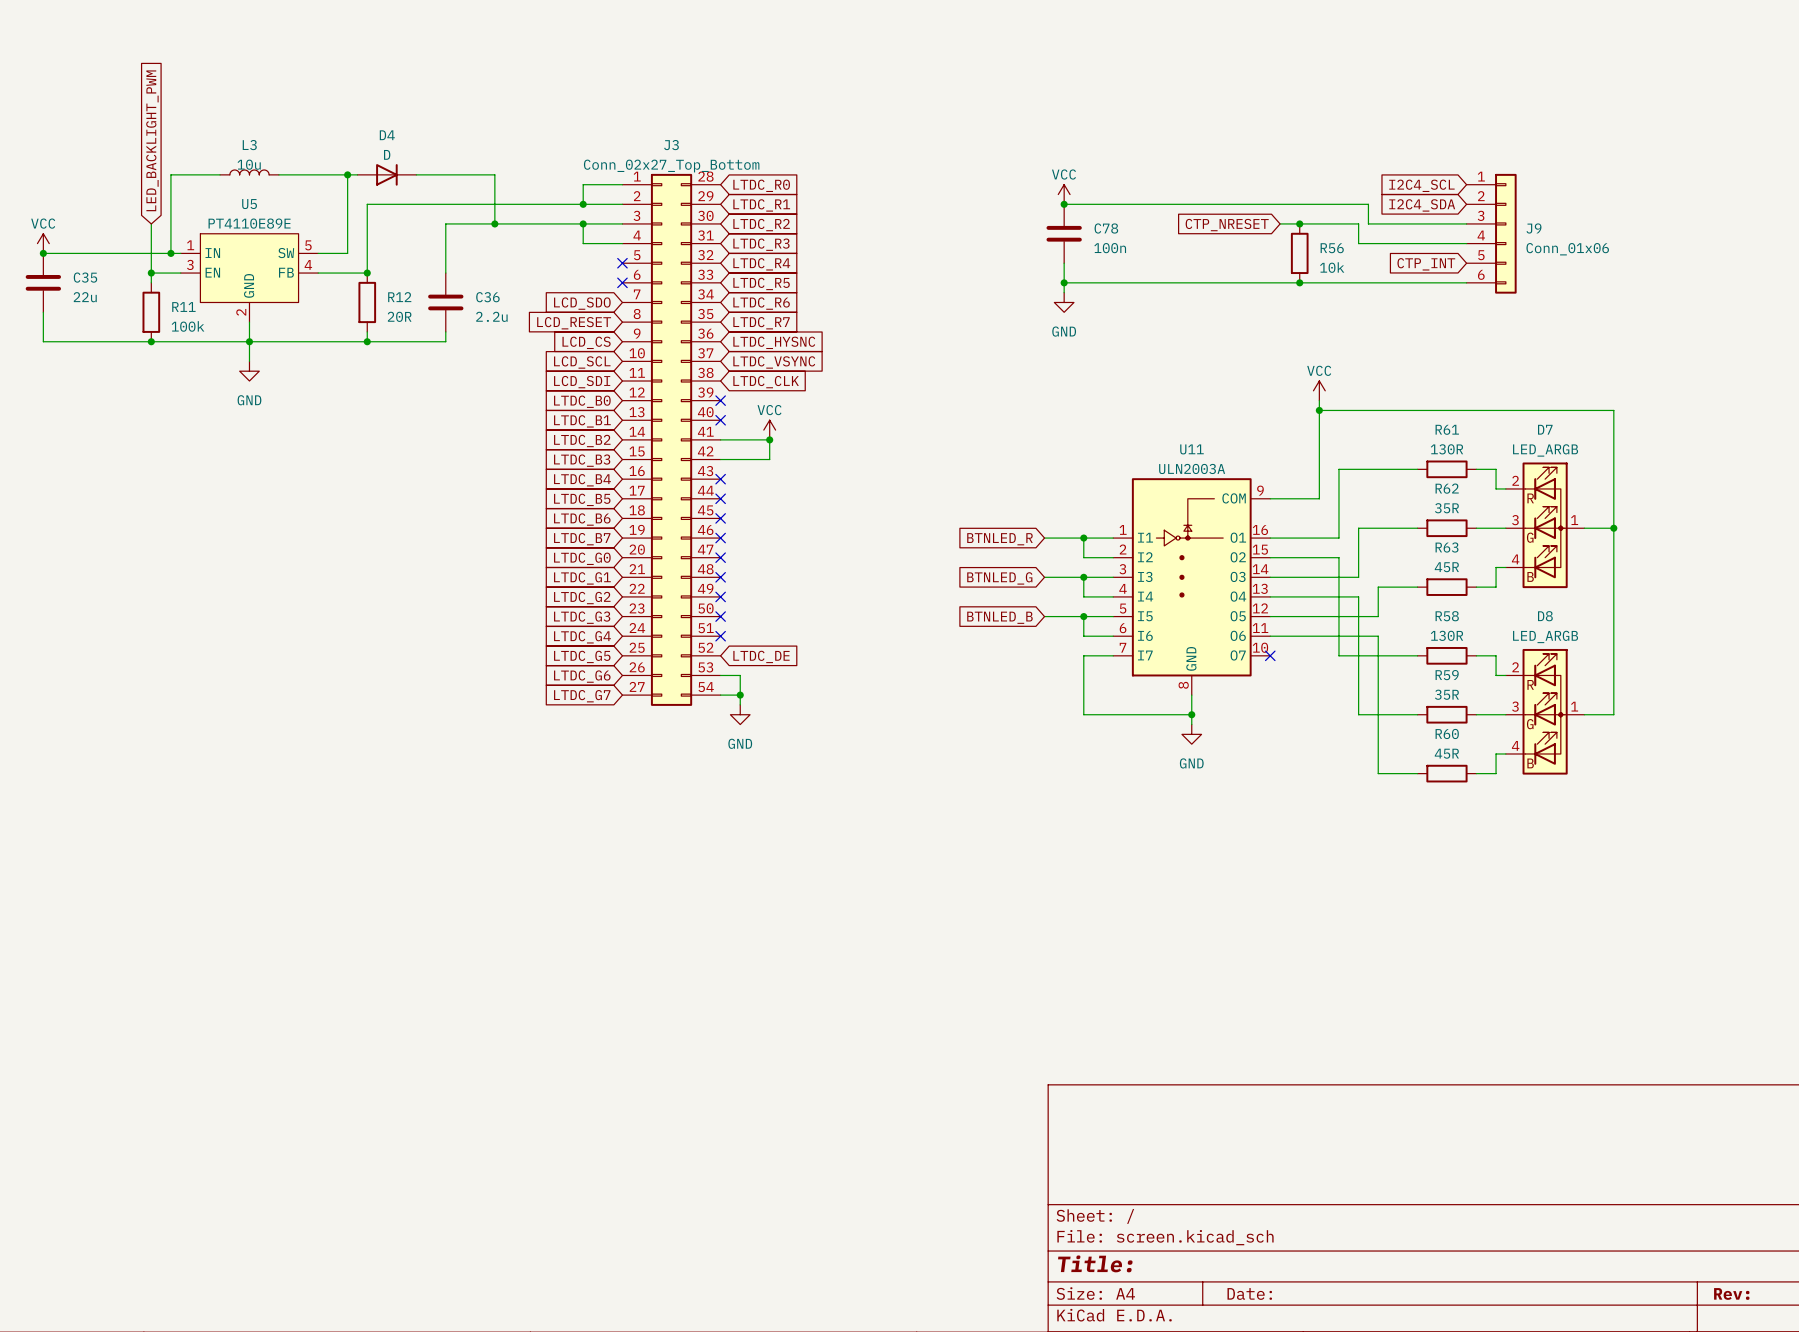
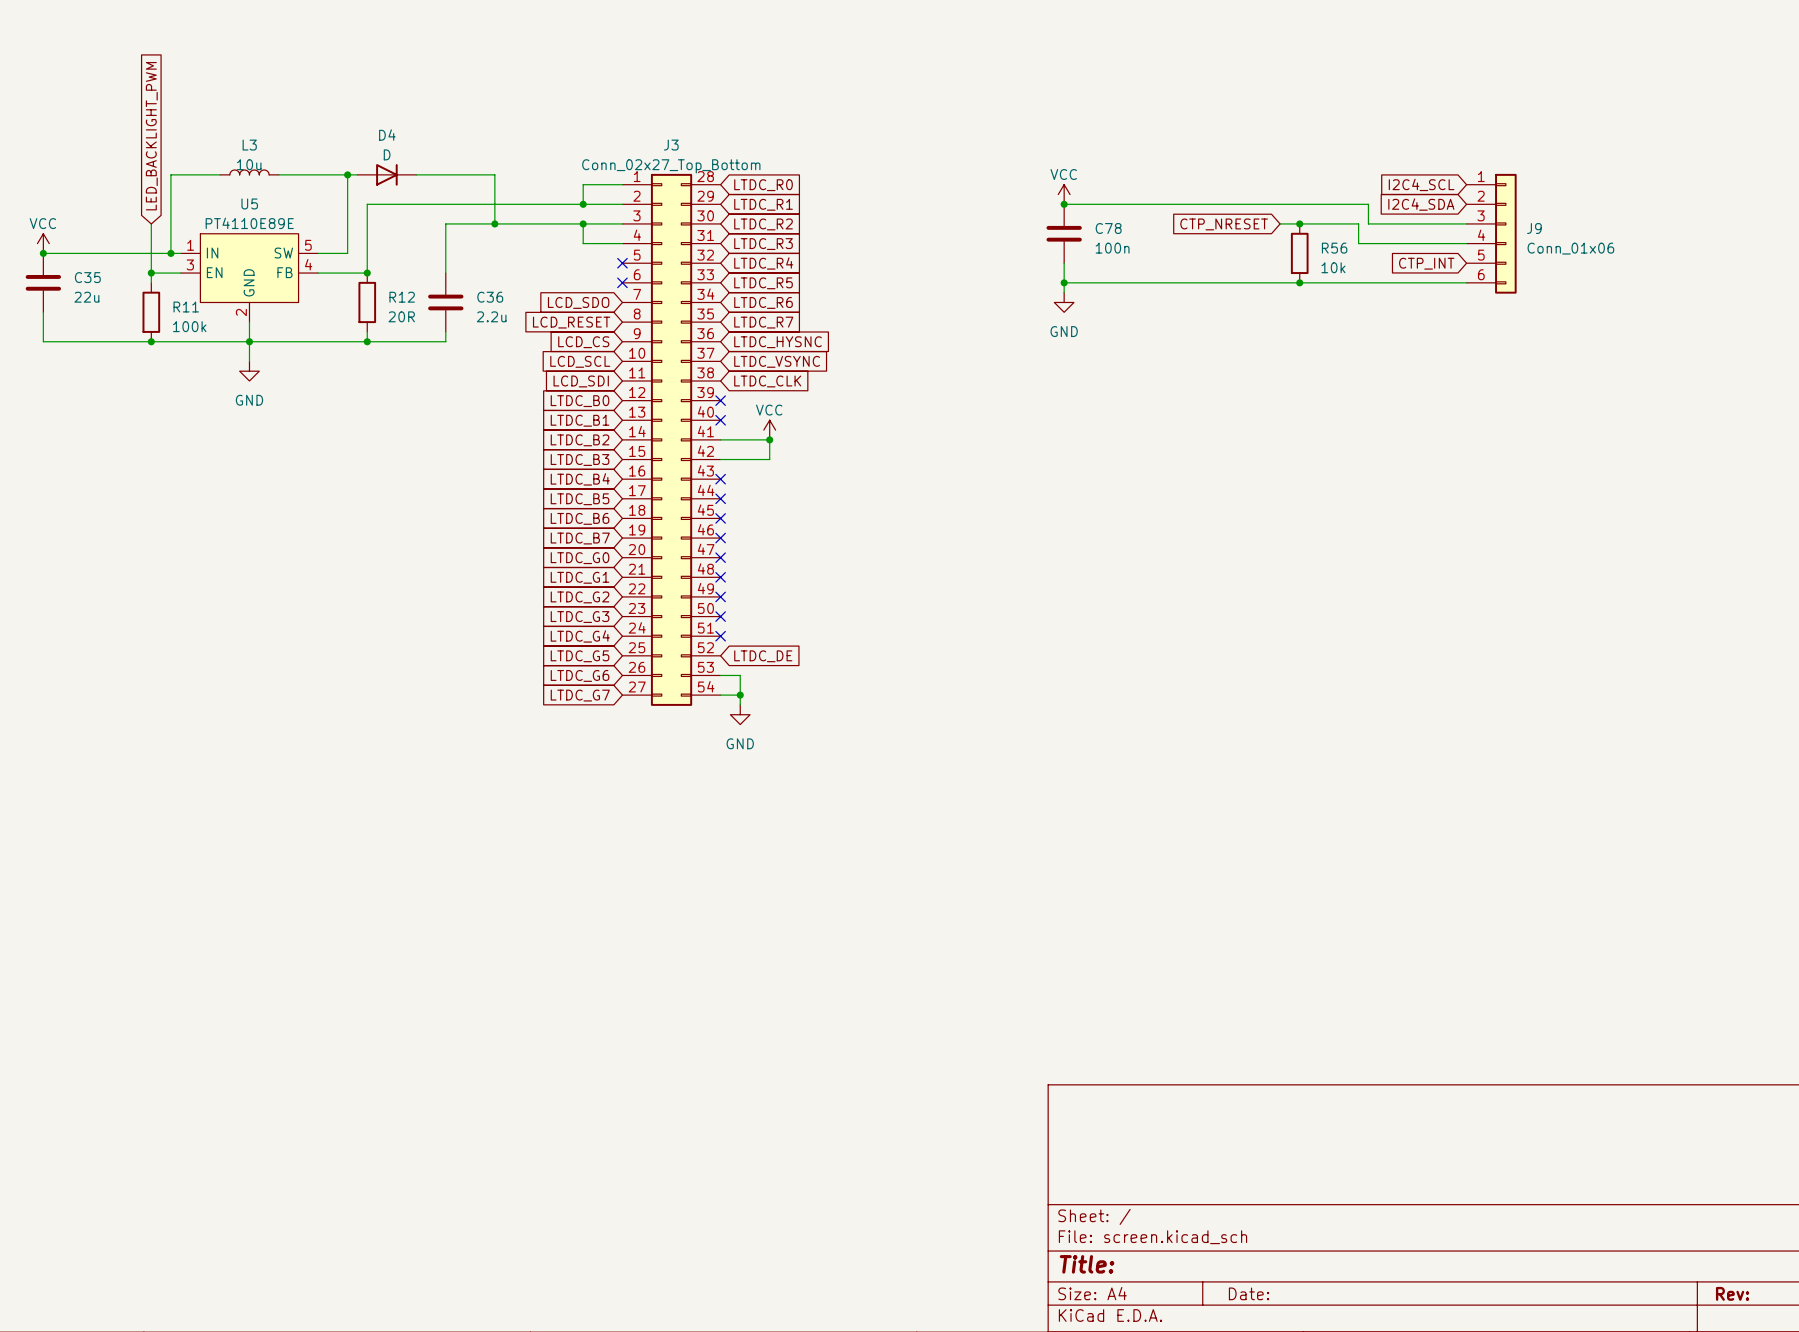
power symbol: VCC (1319, 390) -> none
wire: (1319, 400) (1319, 498) (1270, 498) -> none
wire: (1319, 410) (1613, 410) (1613, 714) (1584, 714) -> none
junction: (1319, 410) -> none
wire: (1417, 469) (1338, 469) (1338, 538) (1270, 538) -> none
R61: 130R (1446, 469) -> none
wire: (1476, 469) (1496, 469) (1496, 488) (1505, 488) -> none
D7: LED_ARGB (1545, 525) -> none
wire: (1417, 528) (1358, 528) (1358, 577) (1270, 577) -> none
R62: 35R (1446, 528) -> none
wire: (1476, 528) (1505, 528) -> none
wire: (1584, 528) (1613, 528) -> none
junction: (1613, 528) -> none
wire: (1044, 538) (1113, 538) -> none
wire: (1083, 538) (1083, 557) (1113, 557) -> none
junction: (1083, 538) -> none
global label: BTNLED_R (999, 539) -> none
wire: (1270, 557) (1338, 557) (1338, 655) (1417, 655) -> none
wire: (1505, 567) (1496, 567) (1496, 587) (1476, 587) -> none
wire: (1044, 577) (1113, 577) -> none
wire: (1083, 577) (1083, 596) (1113, 596) -> none
junction: (1083, 577) -> none
global label: BTNLED_G (999, 578) -> none
U11: ULN2003A (1191, 586) -> none
wire: (1417, 587) (1378, 587) (1378, 616) (1270, 616) -> none
R63: 45R (1446, 587) -> none
wire: (1270, 596) (1358, 596) (1358, 714) (1417, 714) -> none
wire: (1044, 616) (1113, 616) -> none
wire: (1083, 616) (1083, 636) (1113, 636) -> none
junction: (1083, 616) -> none
global label: BTNLED_B (999, 617) -> none
wire: (1270, 636) (1378, 636) (1378, 773) (1417, 773) -> none
wire: (1113, 655) (1083, 655) (1083, 714) (1191, 714) -> none
no-connect mark: (1270, 655) -> none
R58: 130R (1446, 655) -> none
wire: (1476, 655) (1496, 655) (1496, 675) (1505, 675) -> none
wire: (1191, 695) (1191, 724) -> none
D8: LED_ARGB (1545, 711) -> none
junction: (1191, 714) -> none
R59: 35R (1446, 714) -> none
wire: (1476, 714) (1505, 714) -> none
power symbol: GND (1191, 734) -> none
wire: (1505, 753) (1496, 753) (1496, 773) (1476, 773) -> none
R60: 45R (1446, 773) -> none

